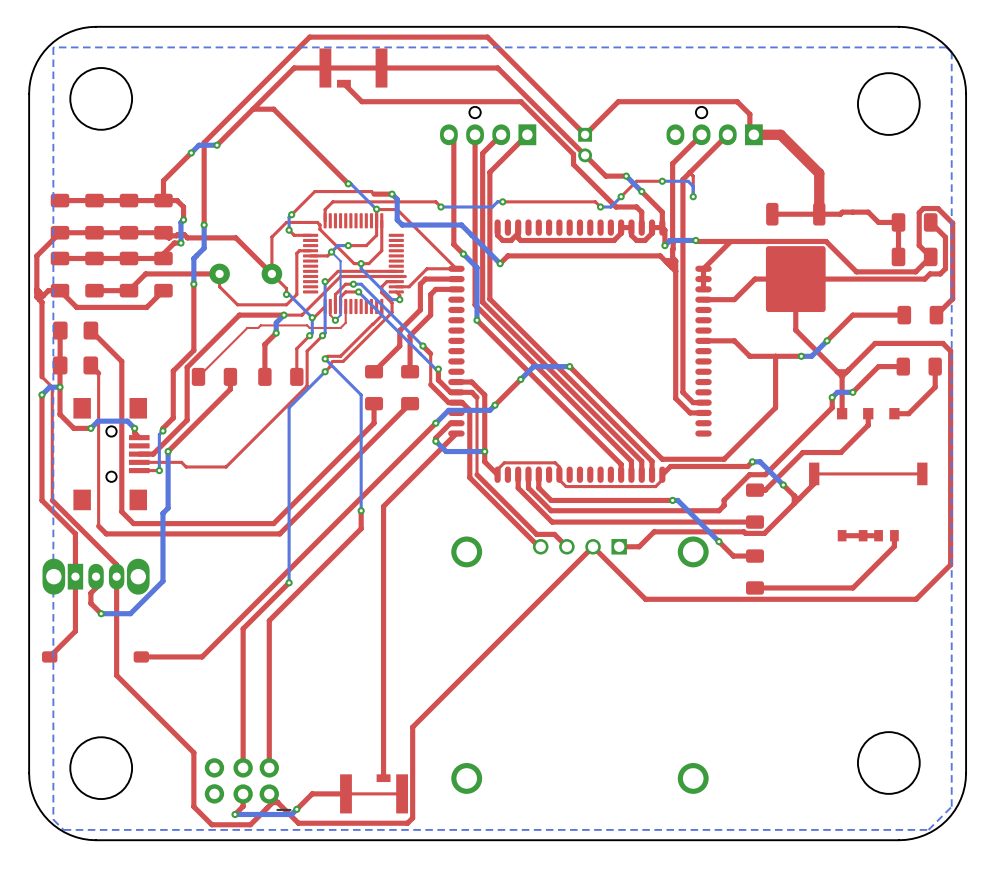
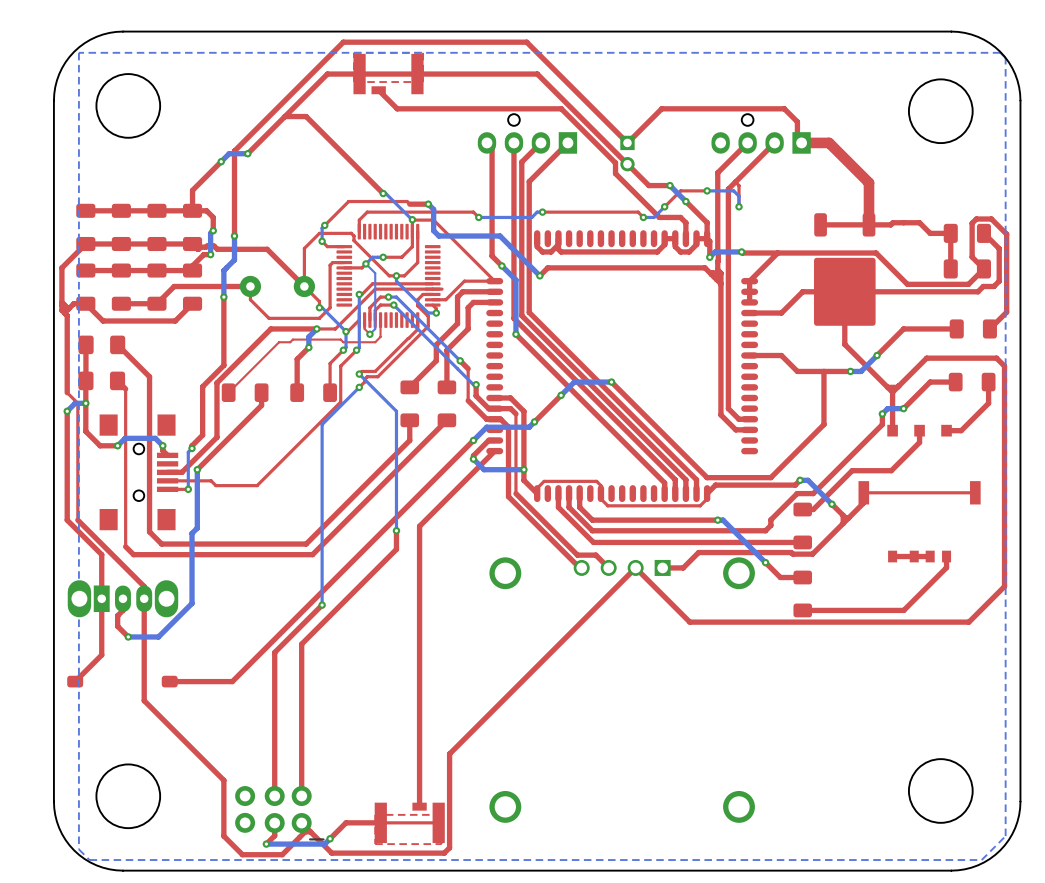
top zone outline: none -> (423, 52) (353, 52) (353, 82) (423, 82) (423, 52)
top zone outline: none -> (441, 814) (375, 814) (375, 844) (441, 844) (441, 814)

